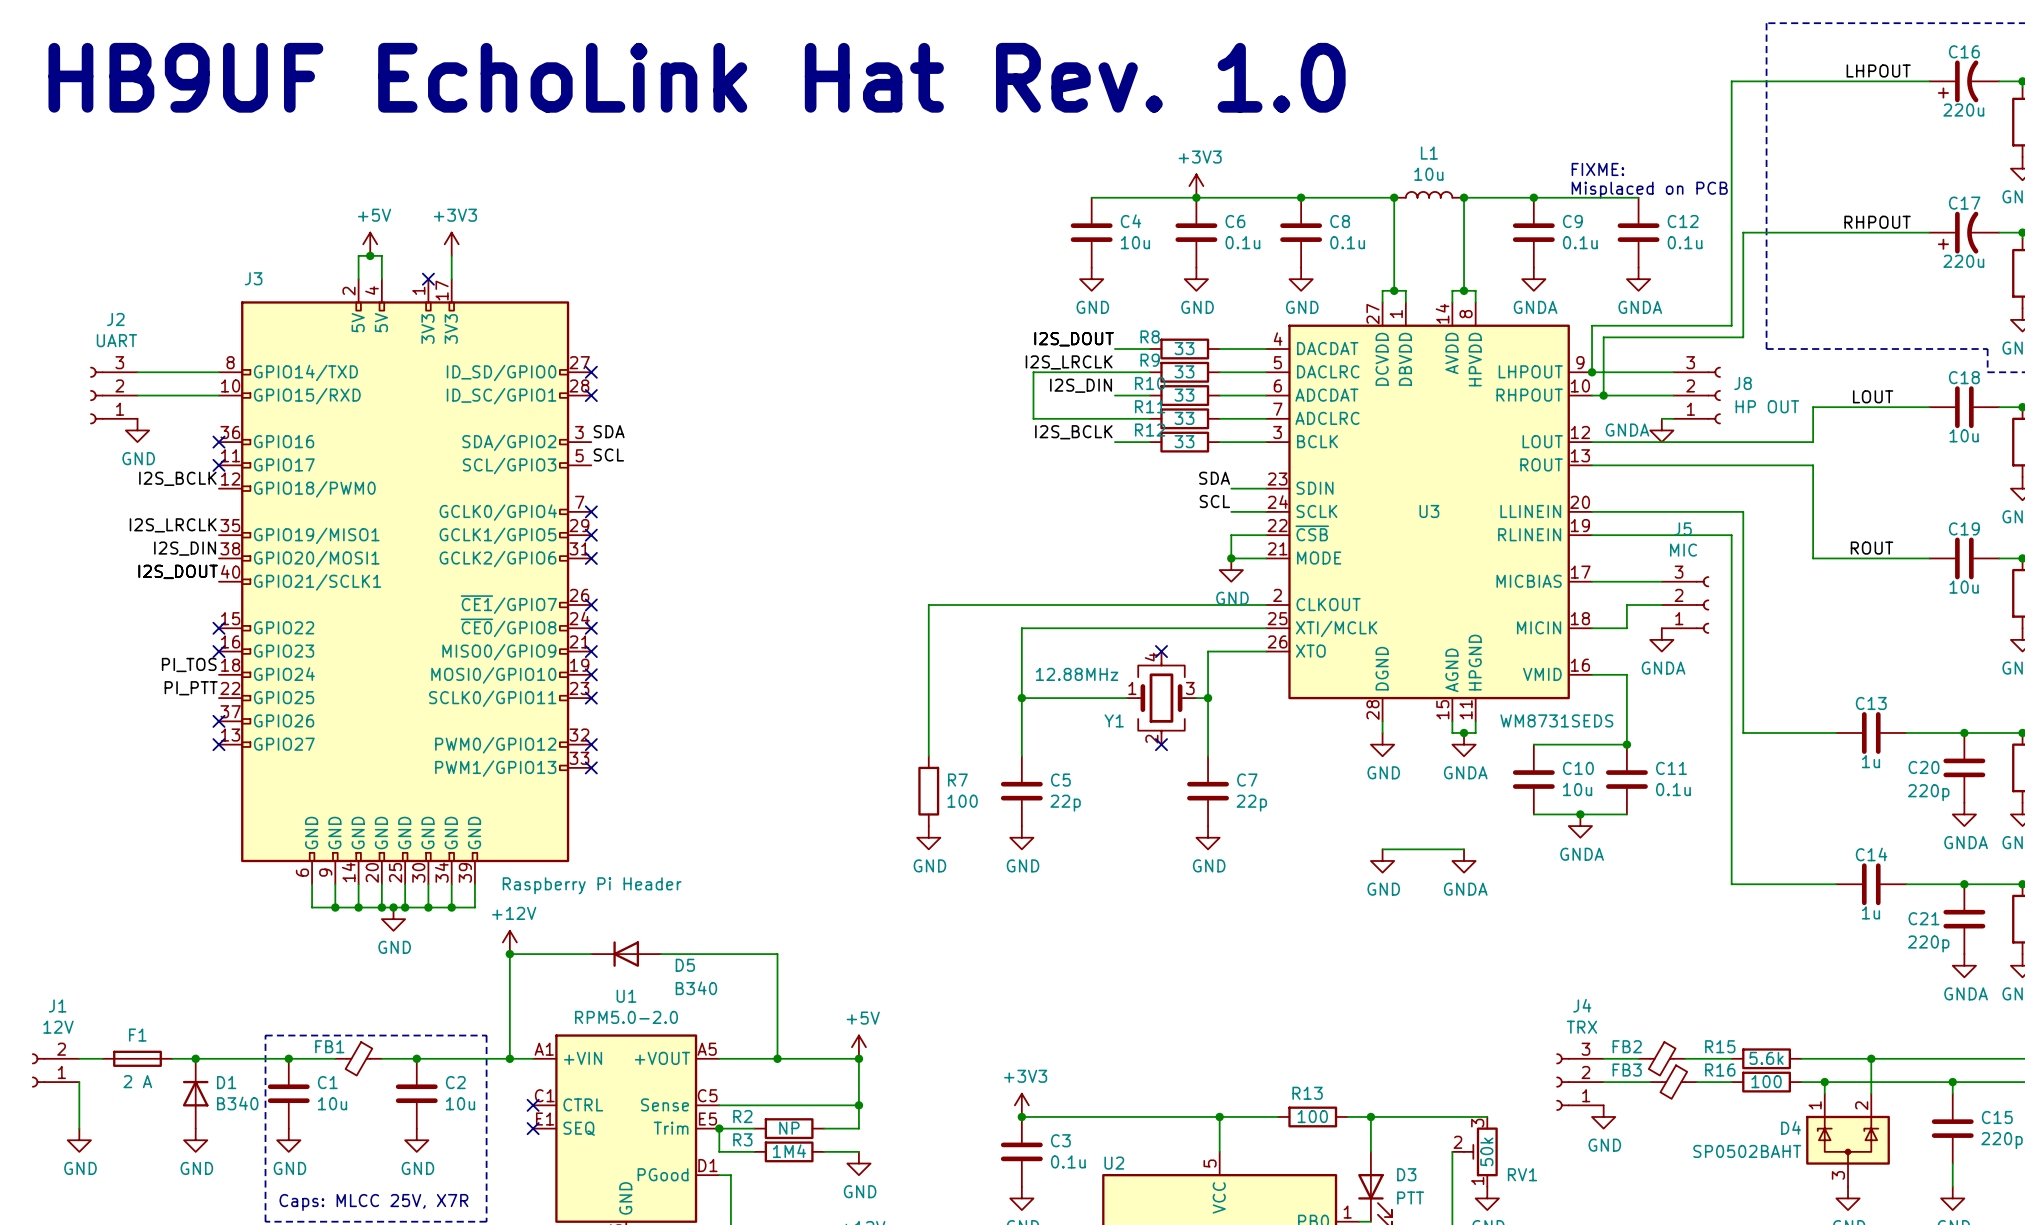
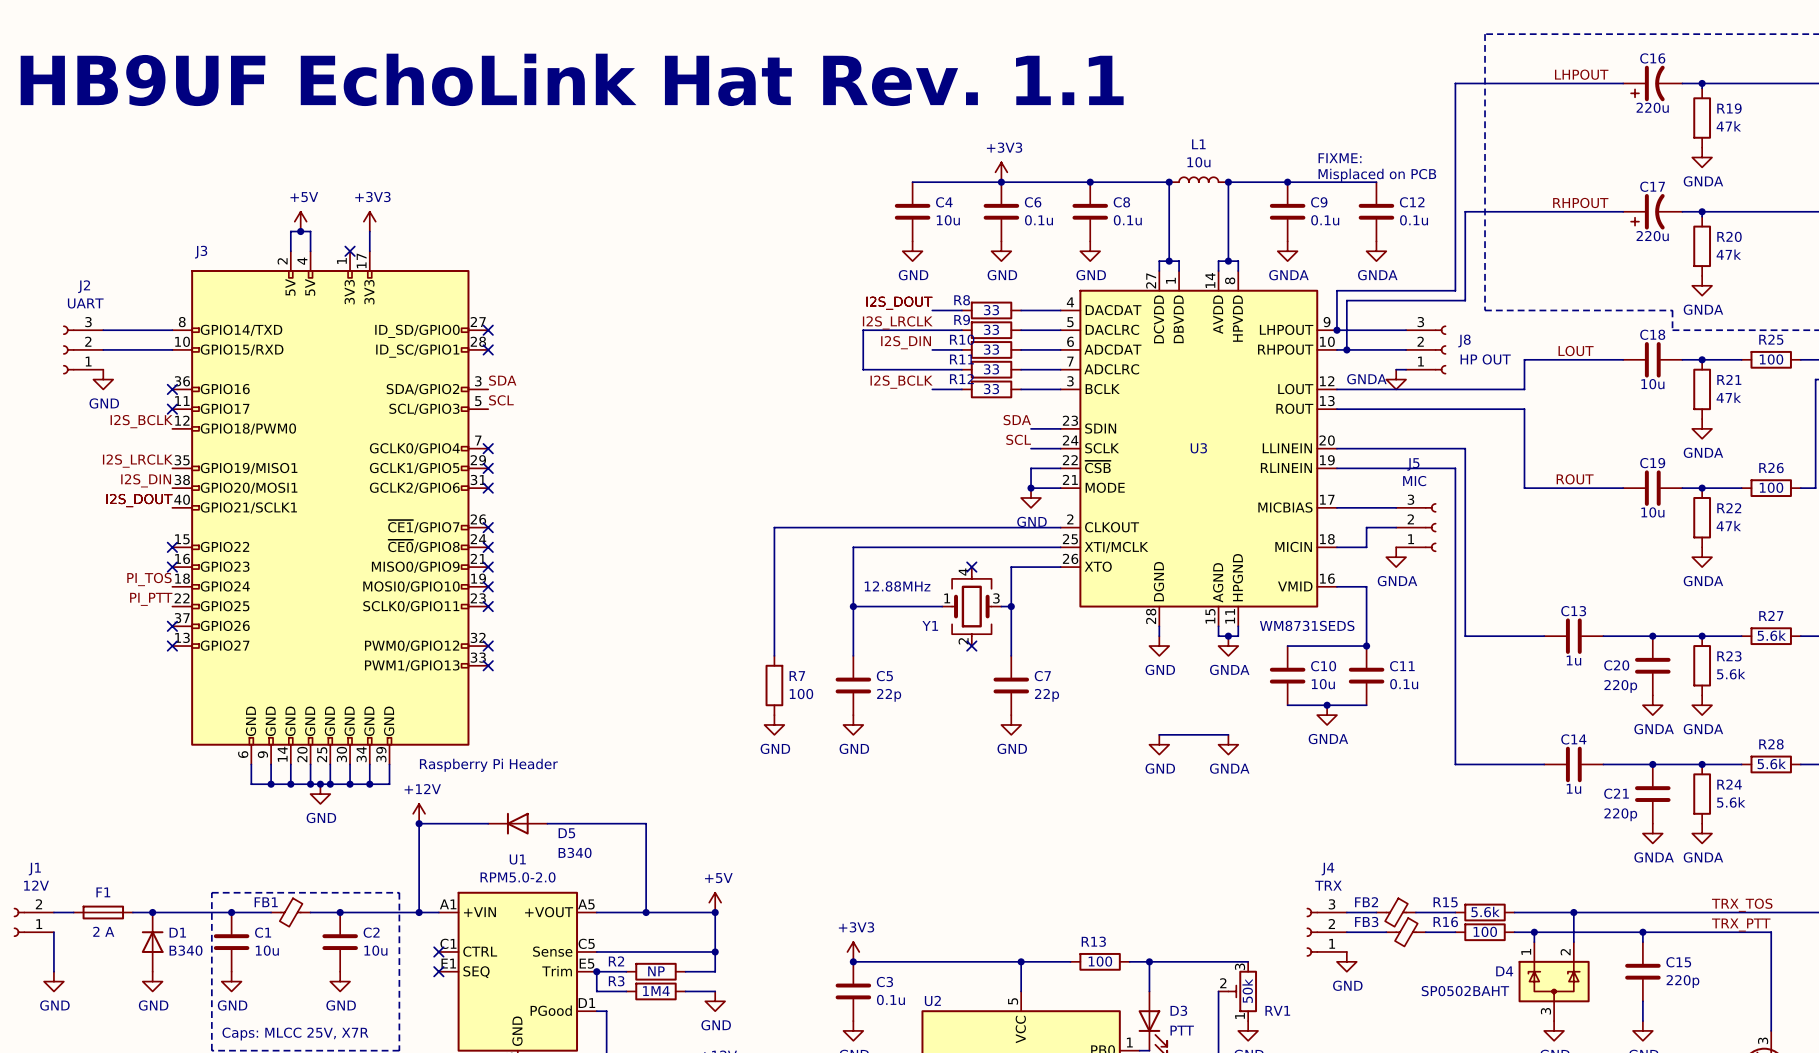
text: HB9UF EchoLink Hat Rev. 1.0 (697, 77) -> HB9UF EchoLink Hat Rev. 1.1 (572, 79)

